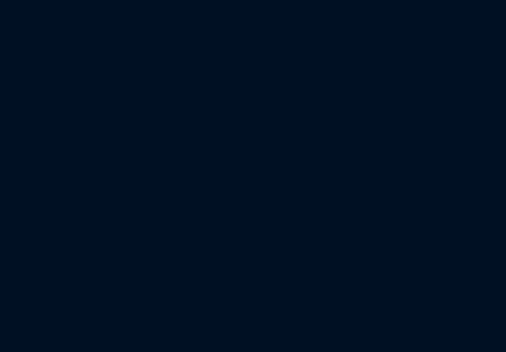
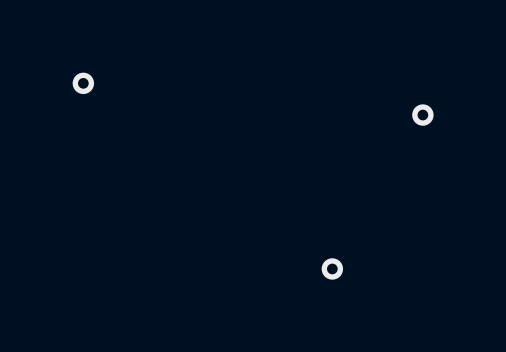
via: none -> (83, 83)
via: none -> (422, 115)
via: none -> (332, 268)

